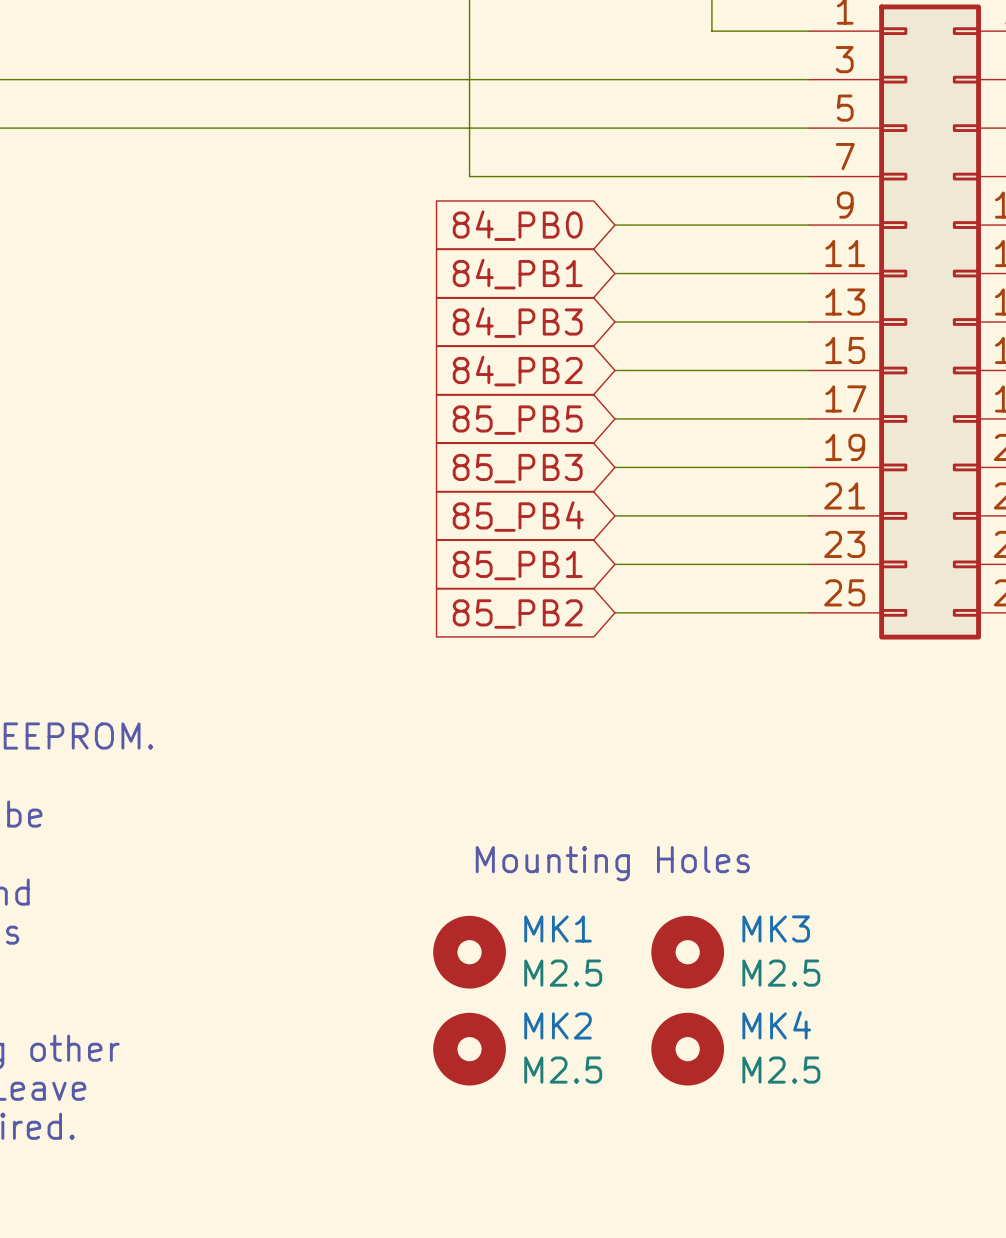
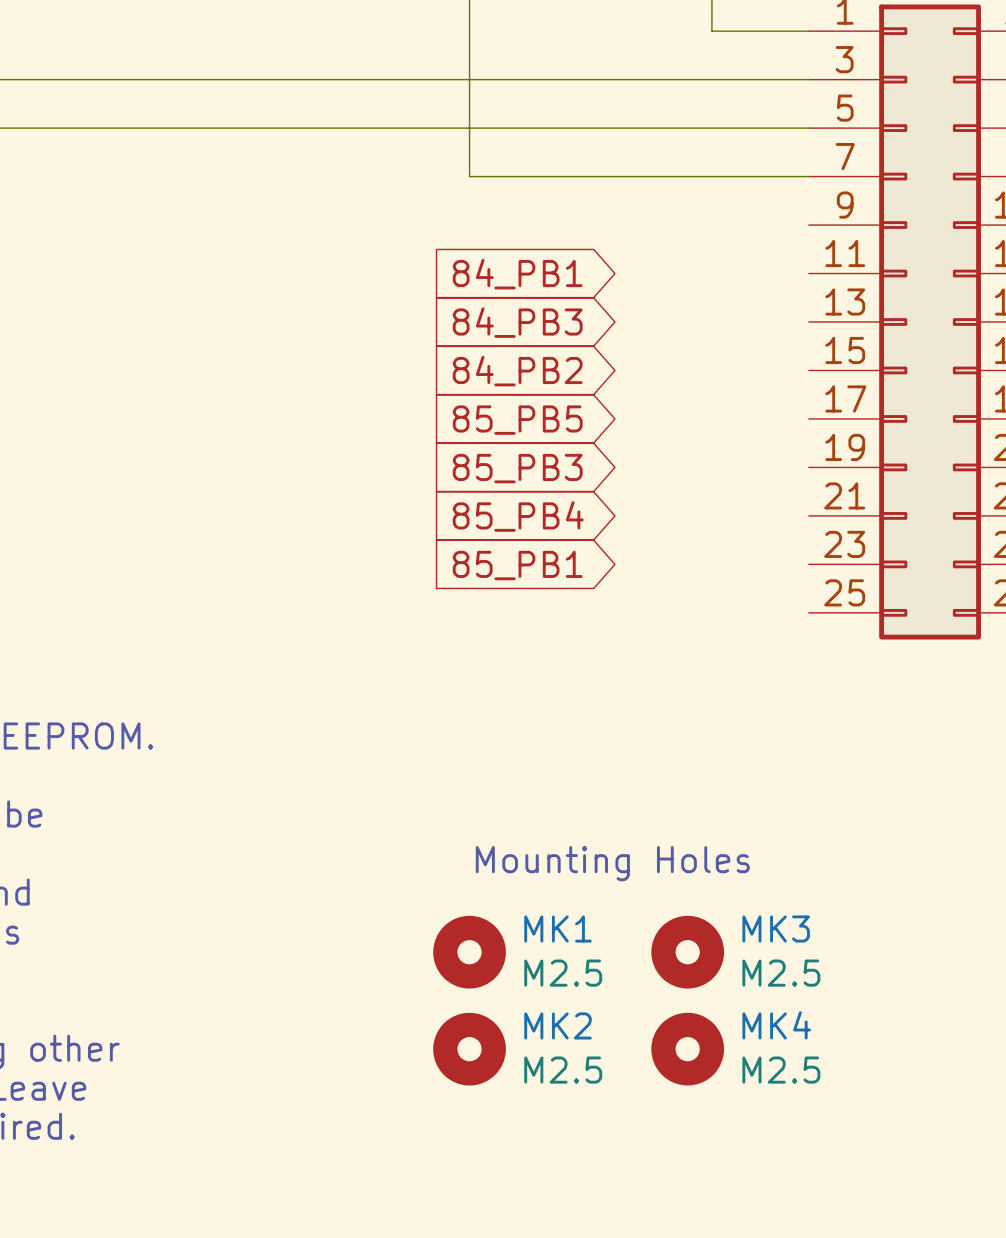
global label: 84_PB0 (517, 225) -> none
wire: (614, 225) (808, 225) -> none
wire: (614, 273) (808, 273) -> none
wire: (614, 322) (808, 322) -> none
wire: (614, 370) (808, 370) -> none
wire: (614, 418) (808, 418) -> none
wire: (614, 467) (808, 467) -> none
wire: (614, 515) (808, 515) -> none
wire: (614, 564) (808, 564) -> none
wire: (614, 612) (808, 612) -> none
global label: 85_PB2 (517, 614) -> none

